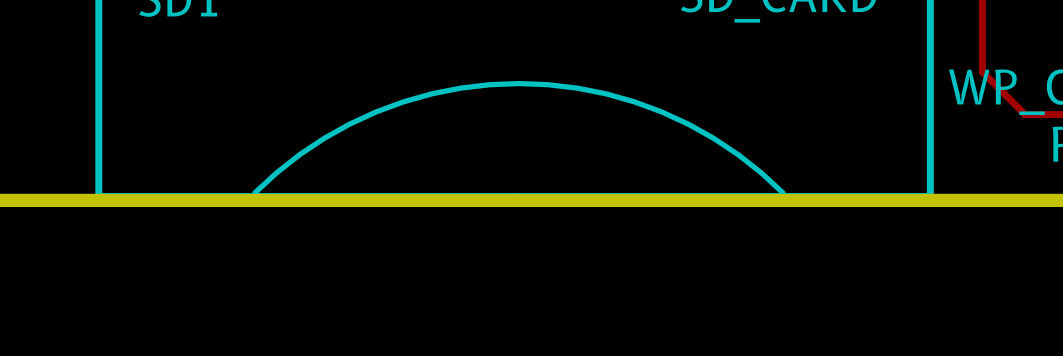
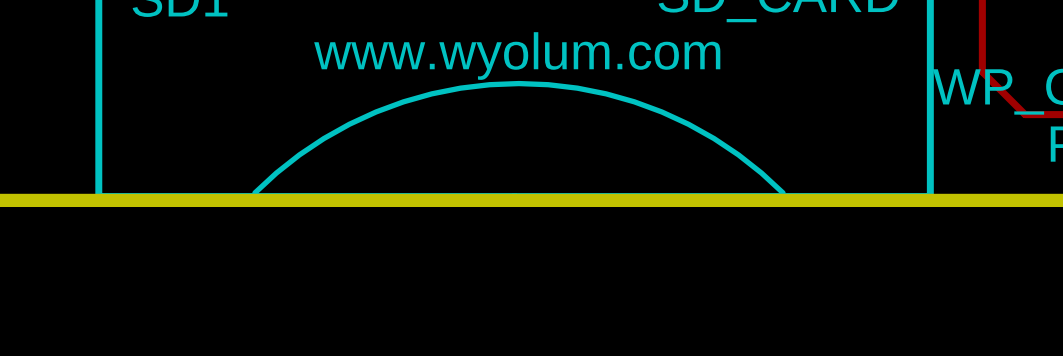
text: none -> www.wyolum.com (517, 56)

